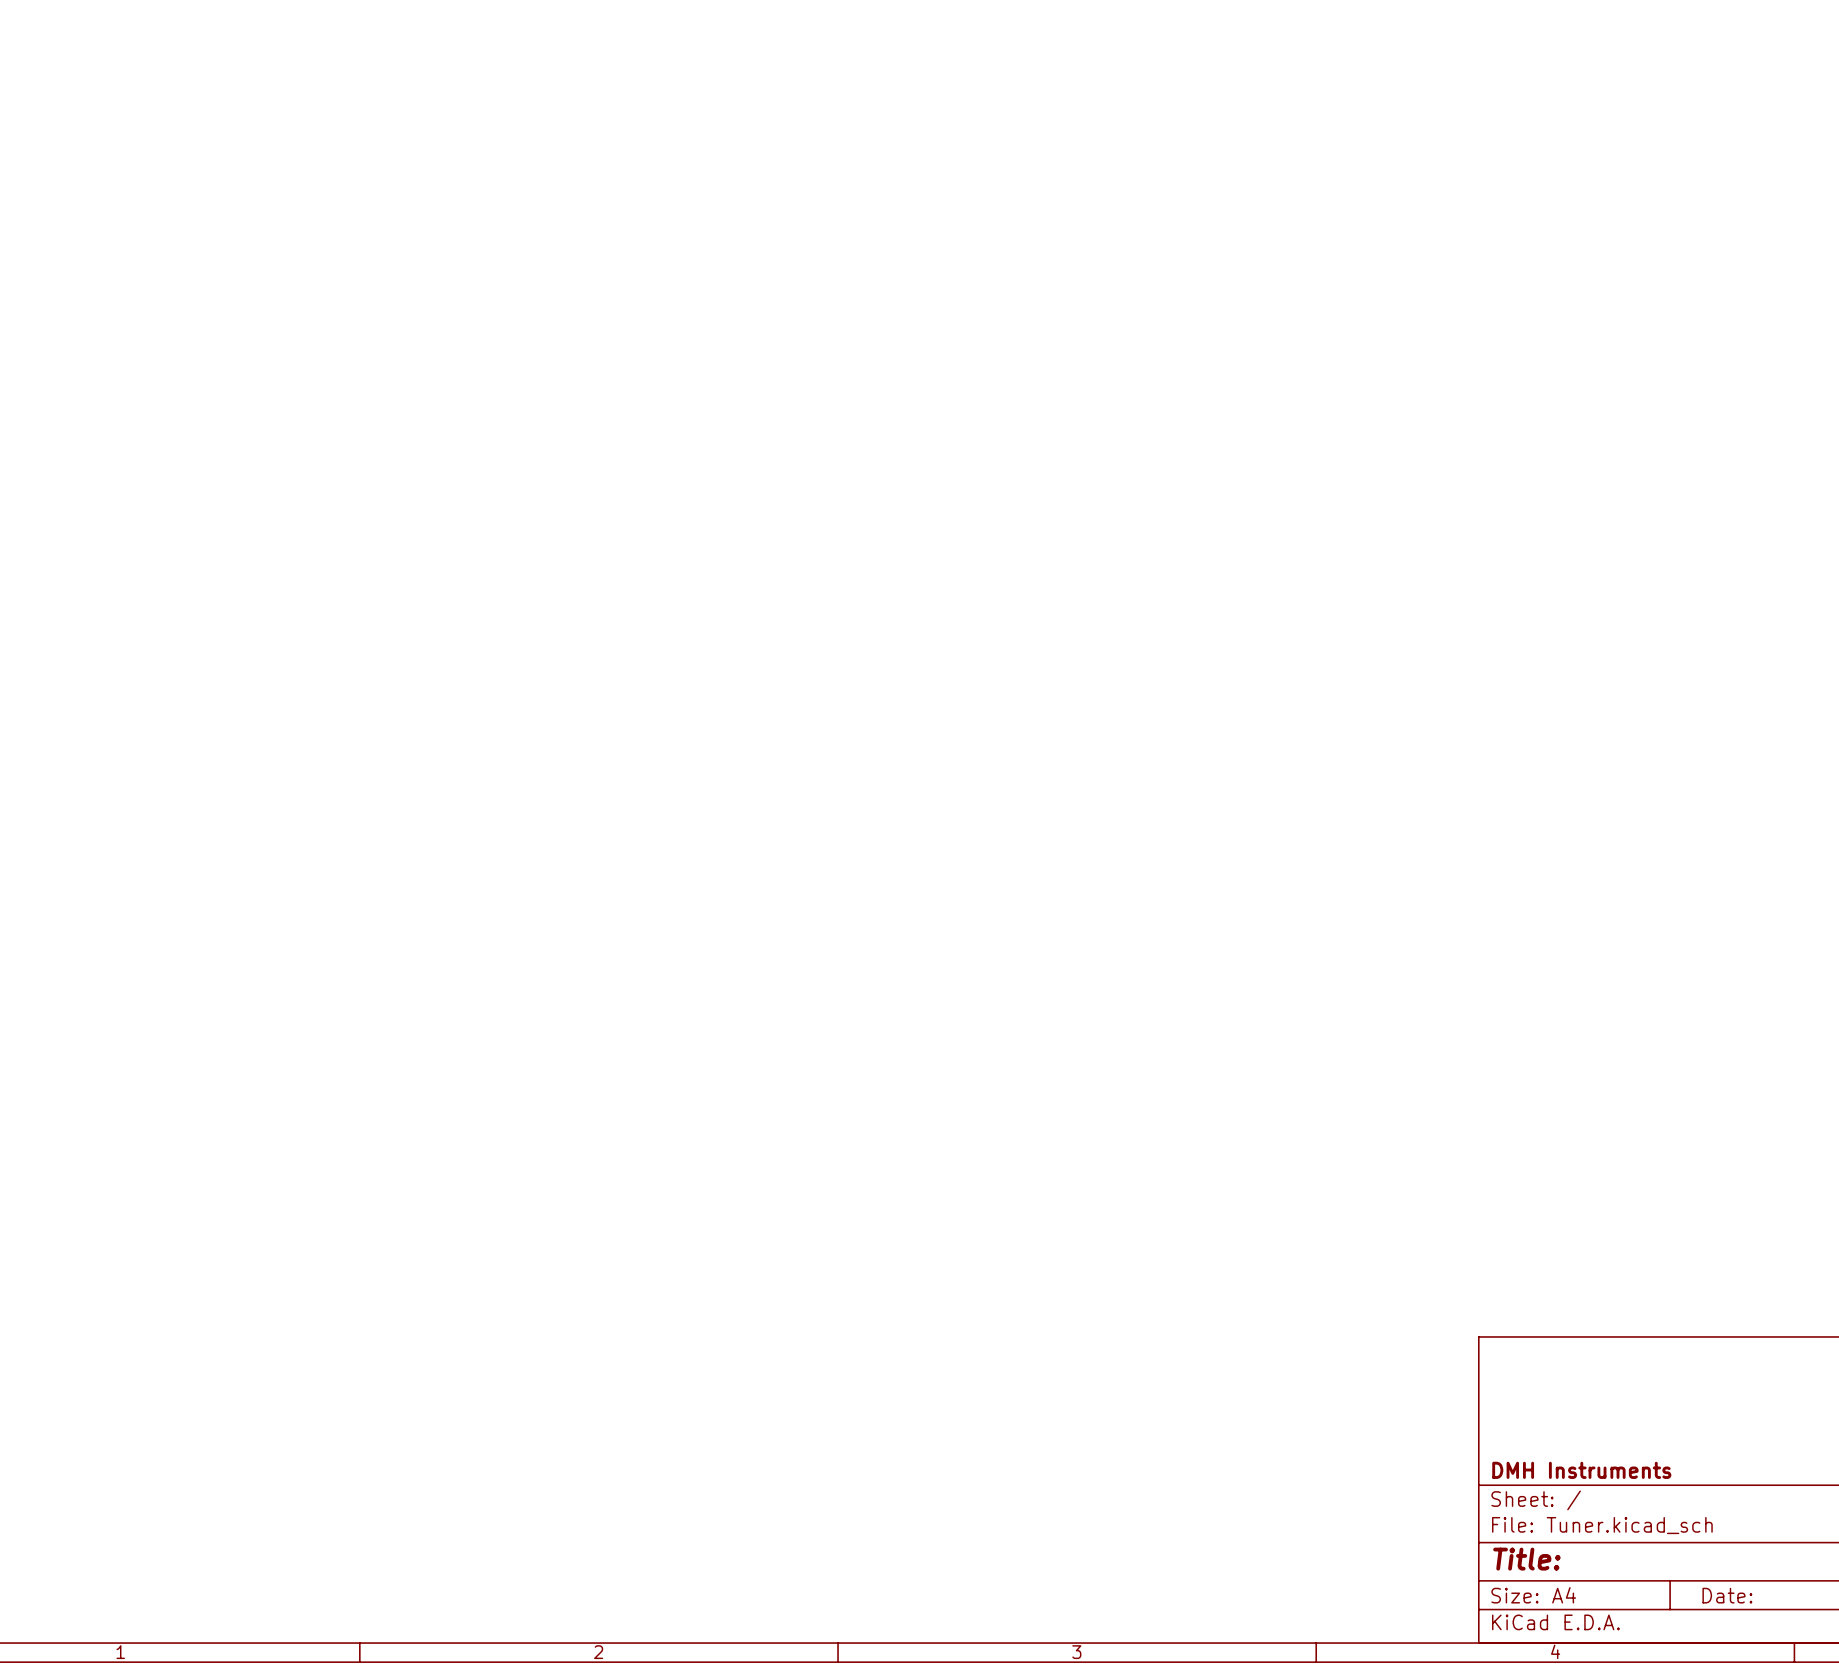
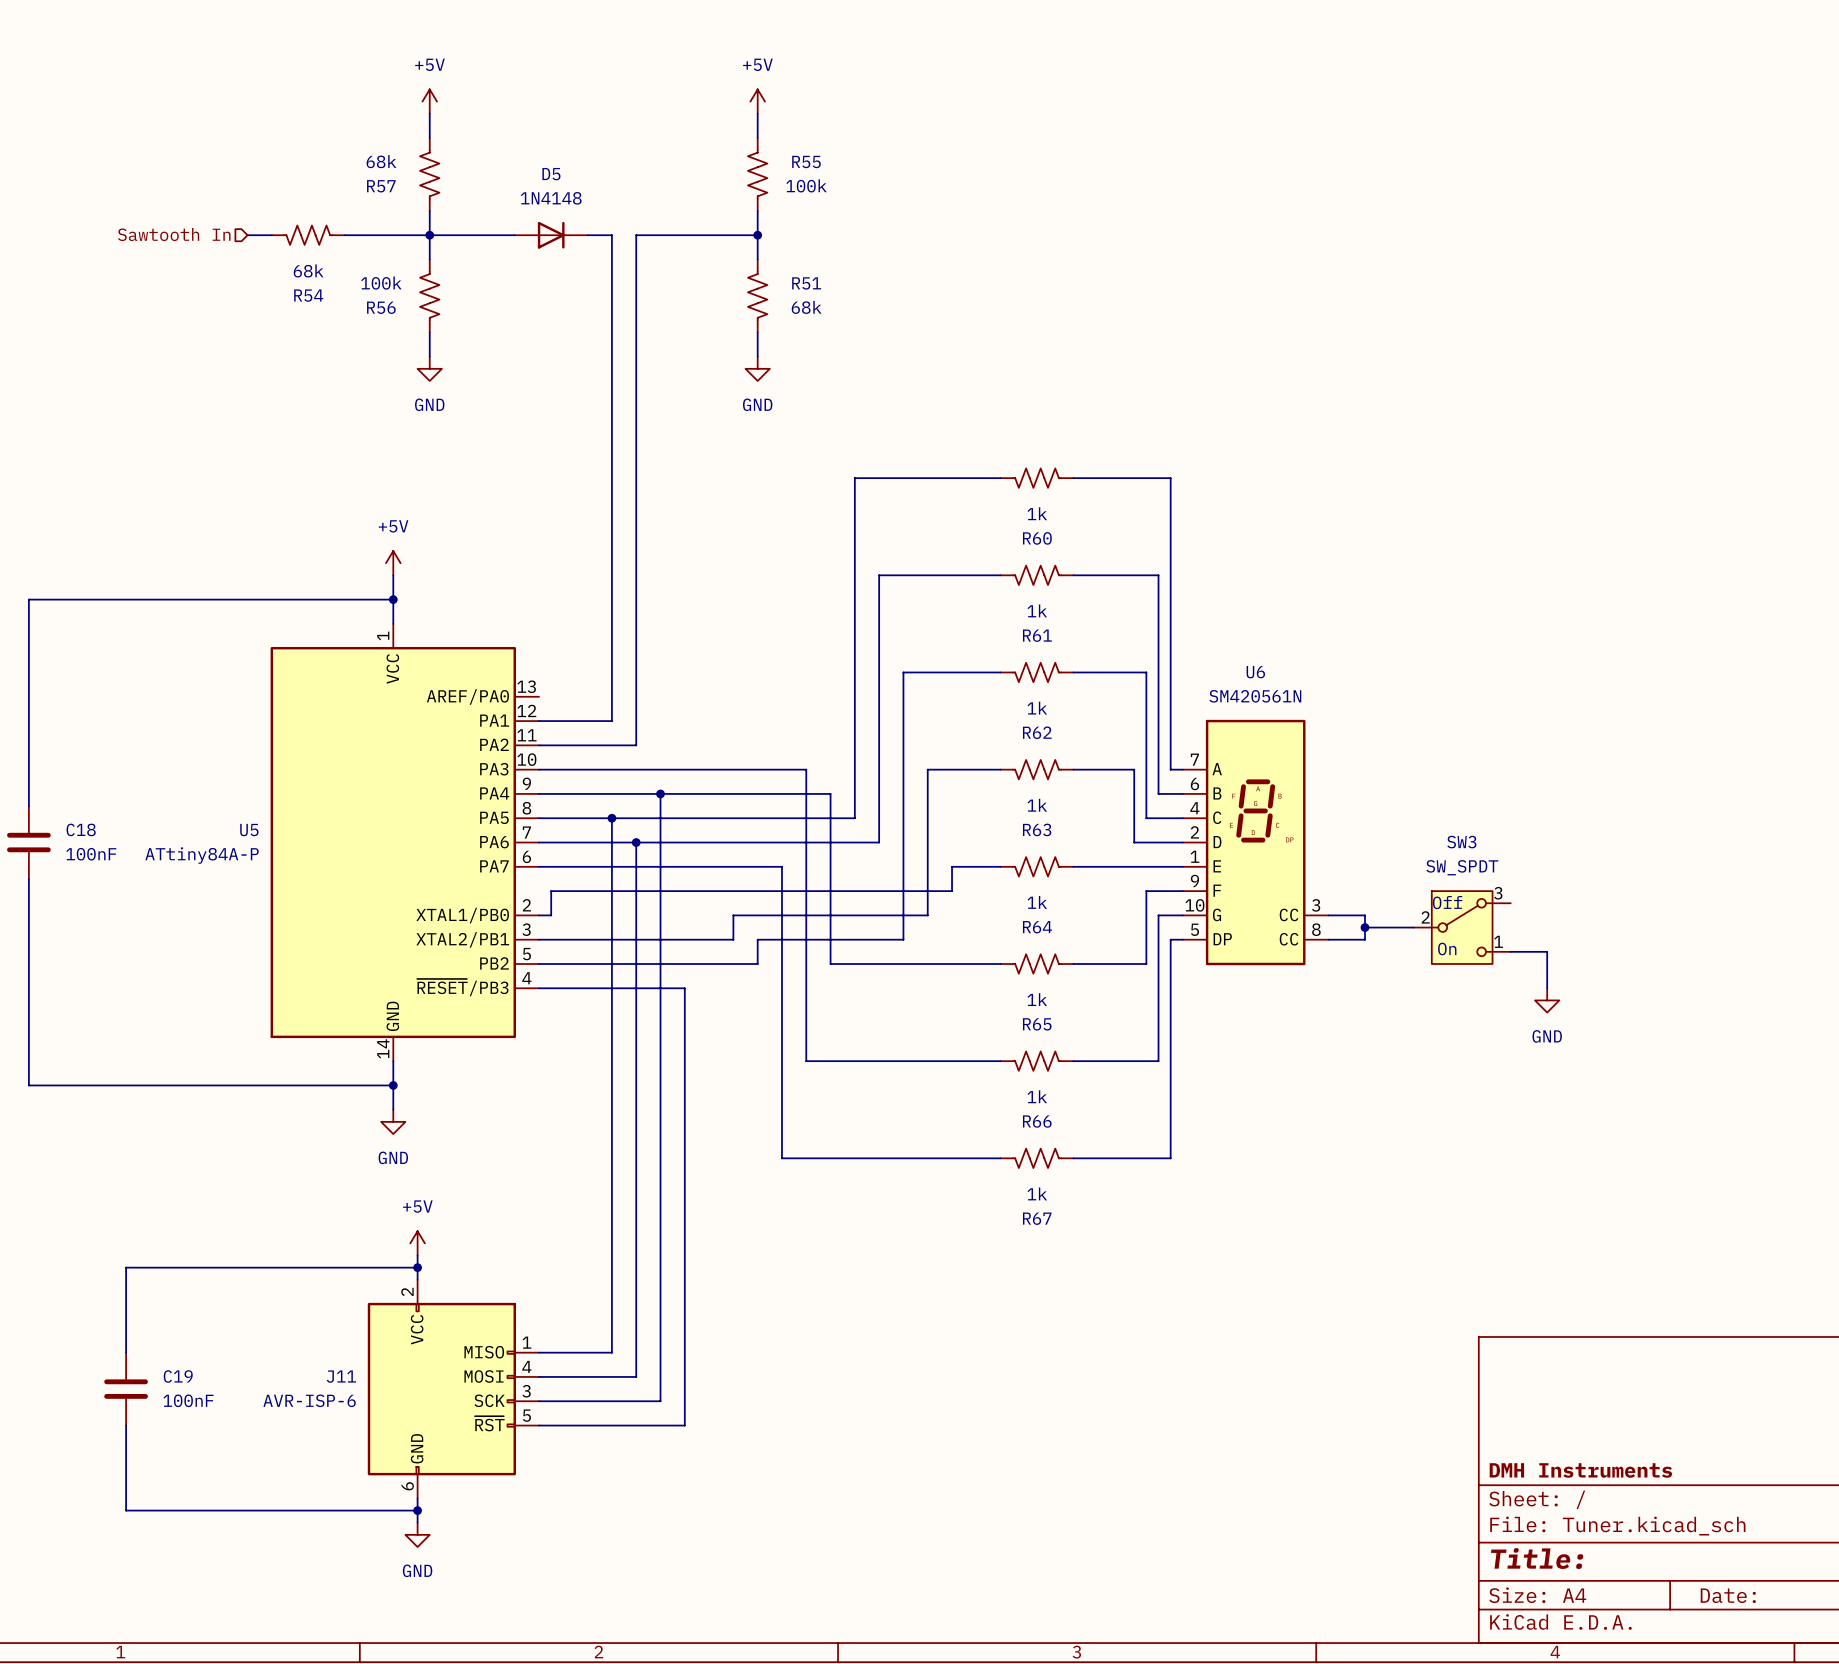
power symbol: none -> +5V (429, 101)
power symbol: none -> +5V (757, 101)
wire: none -> (429, 113) (429, 138)
wire: none -> (757, 113) (757, 138)
R57: none -> 68k (429, 174)
R55: none -> 100k (757, 174)
wire: none -> (429, 210) (429, 259)
wire: none -> (757, 210) (757, 259)
hierarchical label: none -> Sawtooth In (174, 234)
wire: none -> (247, 235) (271, 235)
R54: none -> 68k (308, 235)
wire: none -> (344, 235) (514, 235)
junction: none -> (429, 235)
D5: none -> 1N4148 (551, 235)
wire: none -> (587, 235) (611, 235) (611, 721) (539, 721)
wire: none -> (757, 235) (636, 235) (636, 745) (539, 745)
junction: none -> (757, 235)
R56: none -> 100k (429, 295)
R51: none -> 68k (757, 295)
wire: none -> (429, 332) (429, 356)
wire: none -> (757, 332) (757, 356)
power symbol: none -> GND (429, 368)
power symbol: none -> GND (757, 368)
wire: none -> (1000, 478) (854, 478) (854, 818) (539, 818)
R60: none -> 1k (1037, 478)
wire: none -> (1073, 478) (1170, 478) (1170, 769) (1182, 769)
power symbol: none -> +5V (393, 563)
wire: none -> (393, 575) (393, 623)
wire: none -> (1000, 575) (879, 575) (879, 842) (539, 842)
R61: none -> 1k (1037, 575)
wire: none -> (1073, 575) (1158, 575) (1158, 793) (1182, 793)
wire: none -> (393, 599) (28, 599) (28, 806)
junction: none -> (393, 599)
wire: none -> (1000, 672) (903, 672) (903, 939) (757, 939) (757, 963) (539, 963)
R62: none -> 1k (1037, 672)
wire: none -> (1073, 672) (1146, 672) (1146, 818) (1182, 818)
wire: none -> (539, 769) (806, 769) (806, 1061) (1000, 1061)
wire: none -> (1000, 769) (927, 769) (927, 915) (733, 915) (733, 939) (539, 939)
R63: none -> 1k (1037, 769)
wire: none -> (1073, 769) (1134, 769) (1134, 842) (1182, 842)
wire: none -> (539, 793) (830, 793) (830, 963) (1000, 963)
wire: none -> (660, 793) (660, 1401) (539, 1401)
junction: none -> (660, 793)
wire: none -> (611, 818) (611, 1352) (539, 1352)
junction: none -> (611, 818)
C18: none -> 100nF (28, 842)
U5: none -> ATtiny84A-P (404, 842)
wire: none -> (636, 842) (636, 1376) (539, 1376)
junction: none -> (636, 842)
U6: none -> SM420561N (1255, 842)
wire: none -> (539, 866) (781, 866) (781, 1158) (1000, 1158)
wire: none -> (1000, 866) (952, 866) (952, 891) (551, 891) (551, 915) (539, 915)
R64: none -> 1k (1037, 866)
wire: none -> (1073, 866) (1182, 866)
wire: none -> (28, 878) (28, 1085) (393, 1085)
wire: none -> (1182, 891) (1146, 891) (1146, 963) (1073, 963)
text: none -> Off (1447, 902)
wire: none -> (1182, 915) (1158, 915) (1158, 1061) (1073, 1061)
wire: none -> (1328, 915) (1364, 915) (1364, 939) (1328, 939)
wire: none -> (1364, 927) (1413, 927)
junction: none -> (1364, 927)
SW3: none -> SW_SPDT (1462, 927)
wire: none -> (1182, 939) (1170, 939) (1170, 1158) (1073, 1158)
text: none -> On (1447, 949)
wire: none -> (1510, 951) (1547, 951) (1547, 988)
R65: none -> 1k (1037, 963)
wire: none -> (539, 988) (684, 988) (684, 1425) (539, 1425)
power symbol: none -> GND (1547, 1000)
wire: none -> (393, 1061) (393, 1109)
R66: none -> 1k (1037, 1061)
junction: none -> (393, 1085)
power symbol: none -> GND (393, 1121)
R67: none -> 1k (1037, 1158)
power symbol: none -> +5V (417, 1243)
wire: none -> (417, 1255) (417, 1279)
wire: none -> (417, 1267) (126, 1267) (126, 1352)
junction: none -> (417, 1267)
C19: none -> 100nF (126, 1389)
J11: none -> AVR-ISP-6 (453, 1389)
wire: none -> (126, 1425) (126, 1510) (417, 1510)
wire: none -> (417, 1498) (417, 1522)
junction: none -> (417, 1510)
power symbol: none -> GND (417, 1534)

